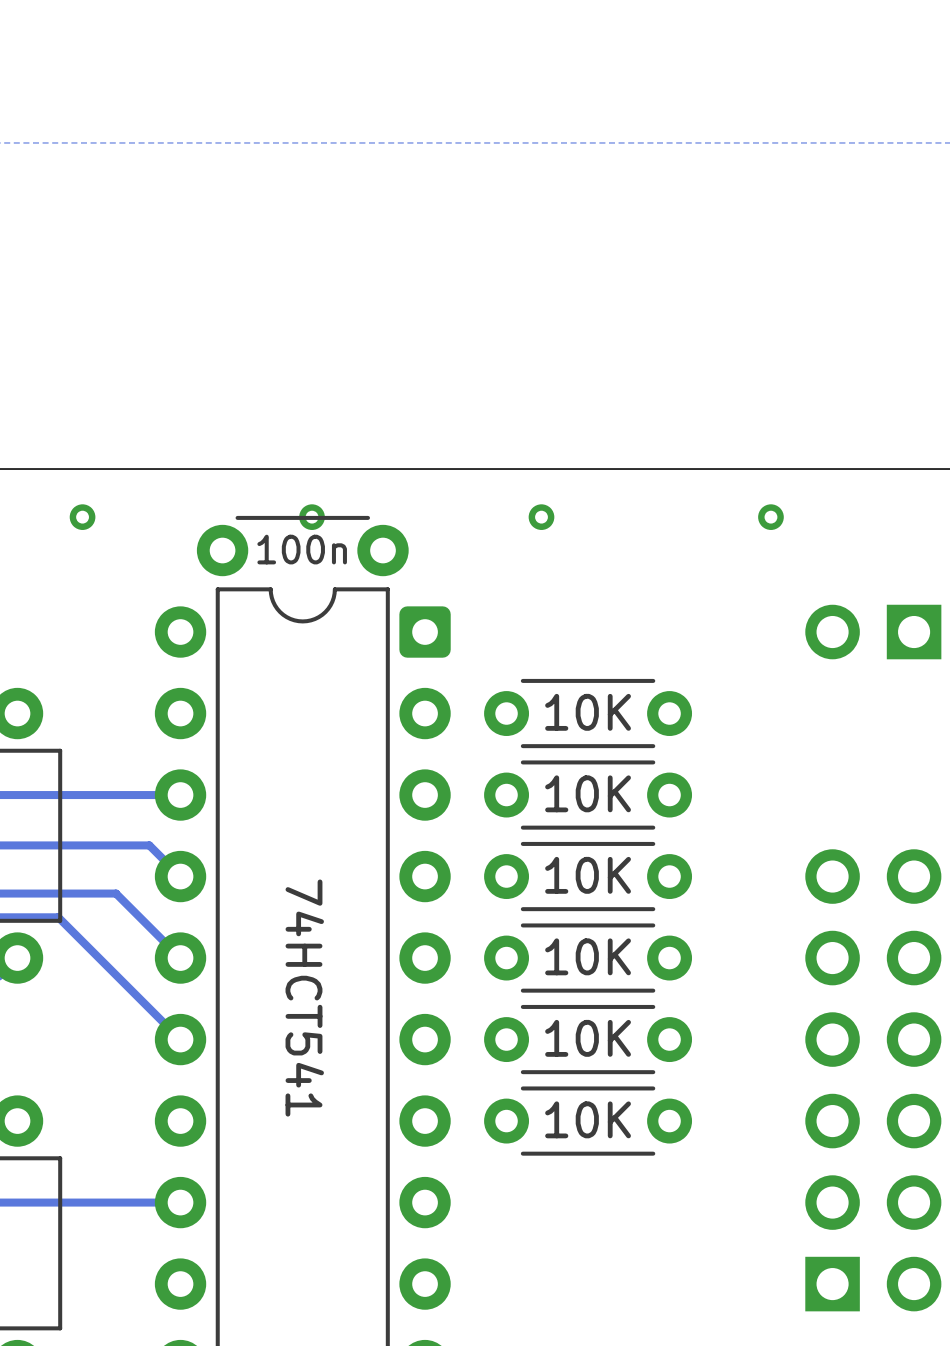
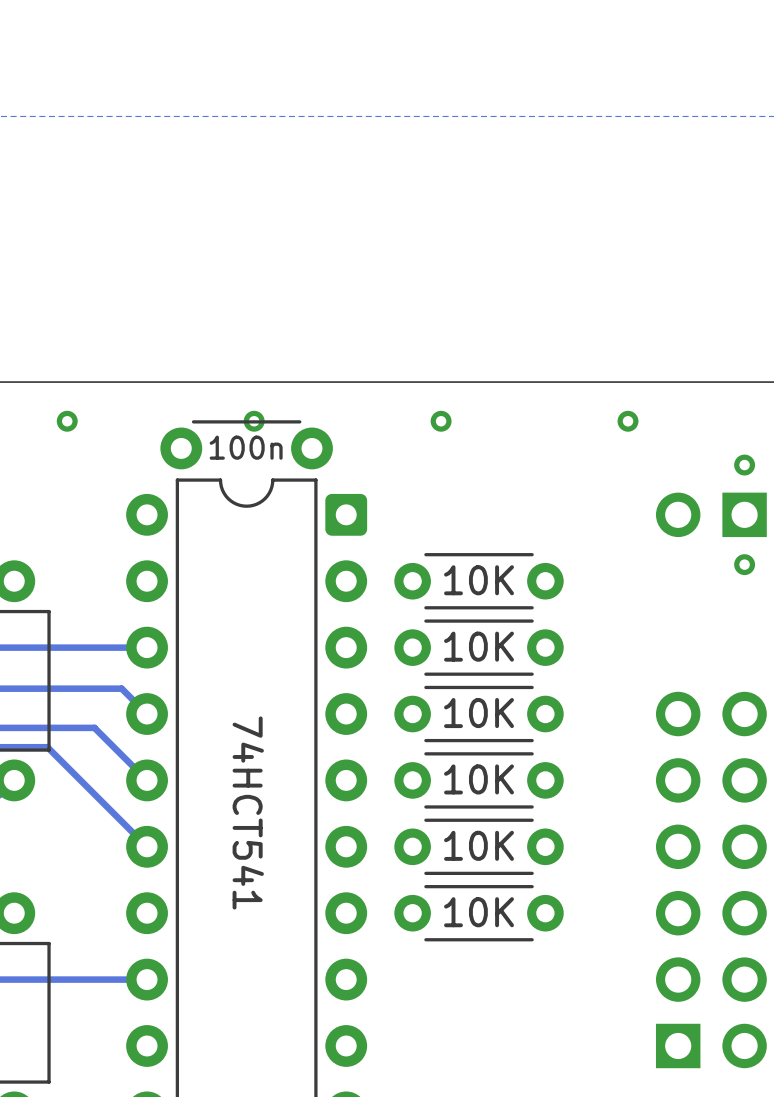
via: none -> (744, 465)
via: none -> (744, 564)

